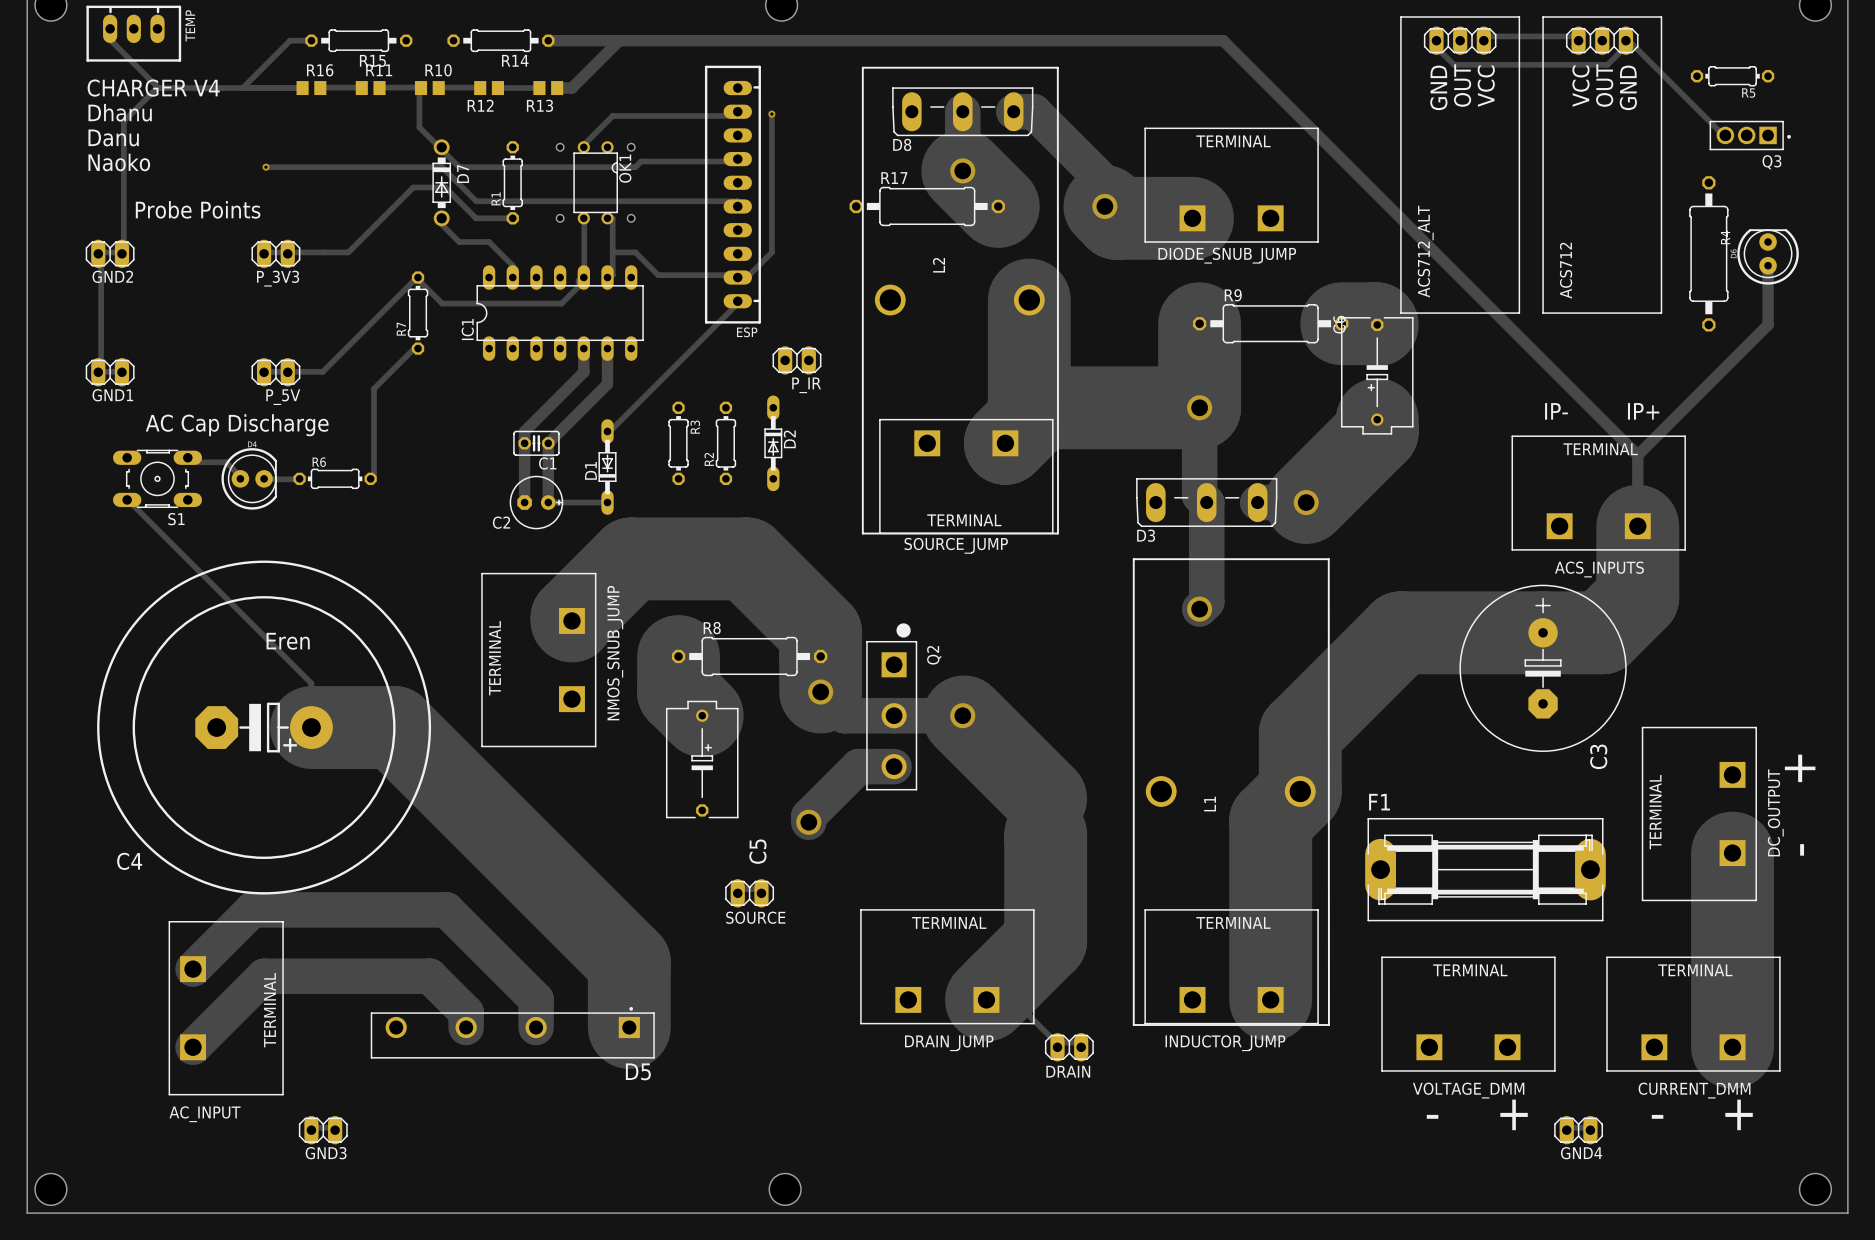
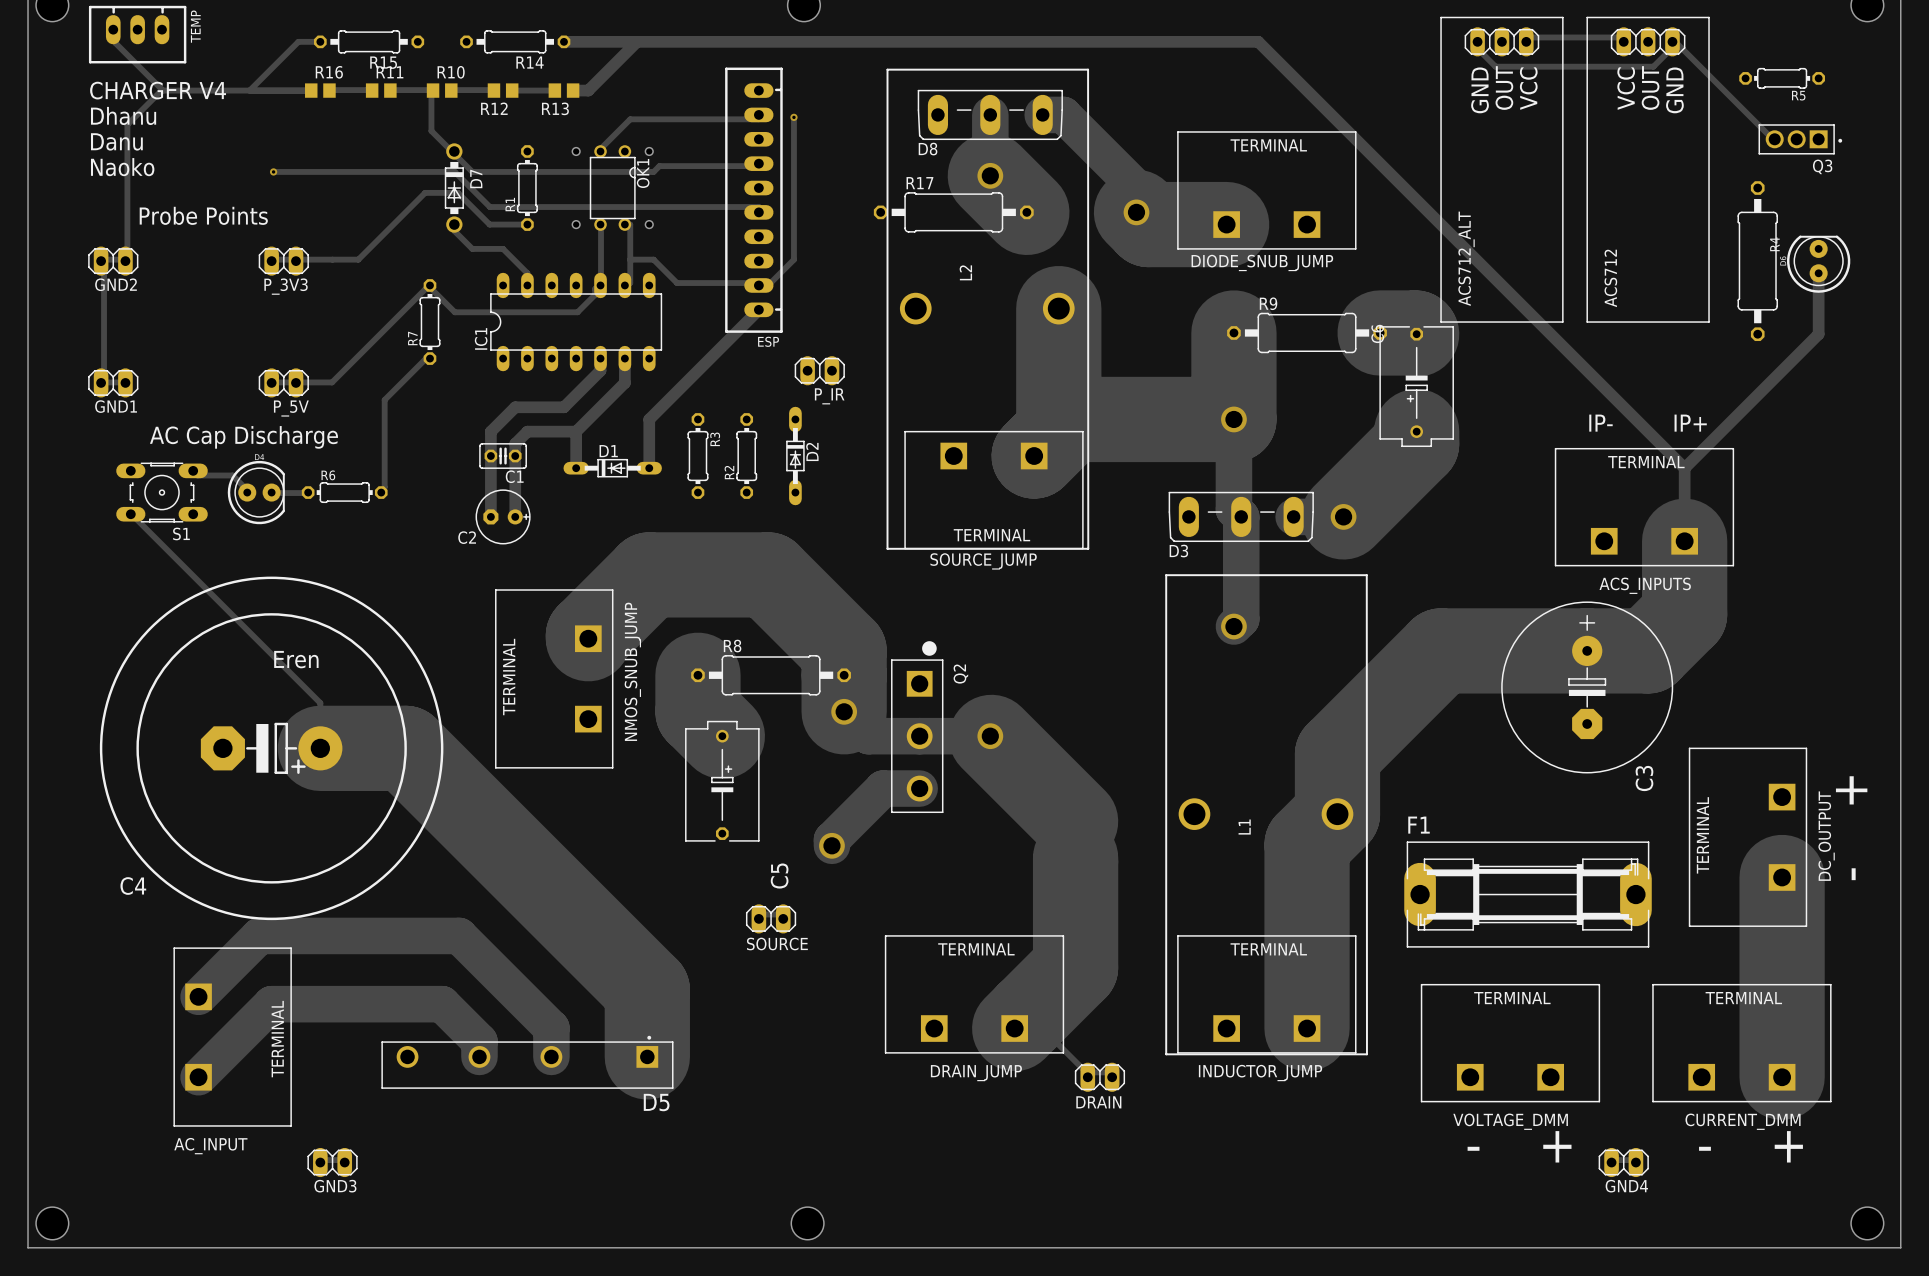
track: (737, 301) (737, 303) (612, 428) (607, 431) -> (758, 309) (649, 419) (649, 468)
track: (583, 360) (583, 372) (524, 431) (524, 502) -> (600, 370) (563, 407) (515, 407) (490, 431) (490, 516)
track: (607, 372) (607, 384) (548, 443) (548, 502) (607, 502) -> (624, 382) (576, 431)
track: none -> (576, 431) (527, 431) (515, 443) (515, 516)
track: none -> (576, 431) (576, 468)
C1 position: (536, 443) -> (503, 456)
D1 rotation: 0° (607, 467) -> 90° clockwise (612, 468)
C2 position: (536, 502) -> (503, 516)

